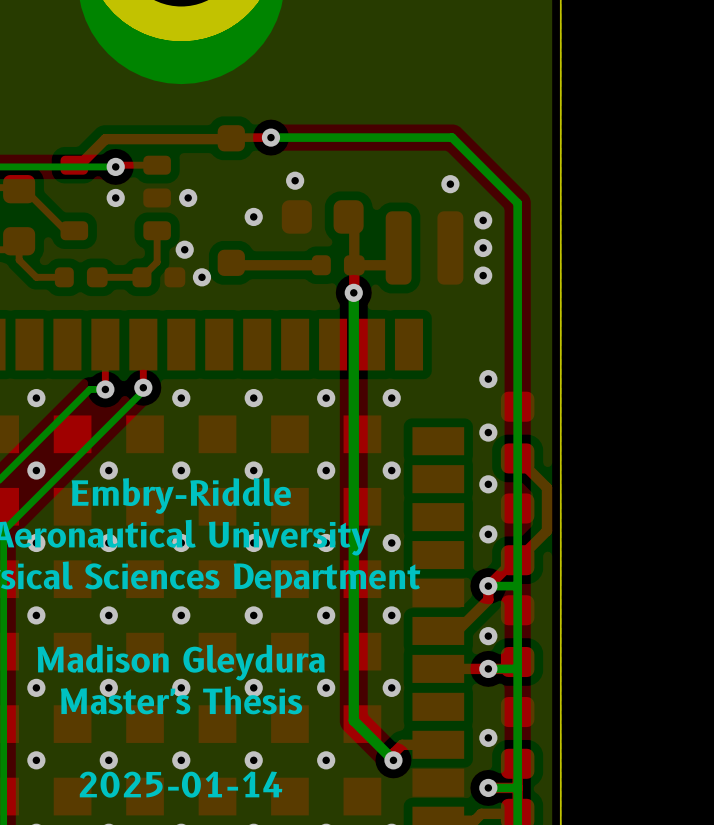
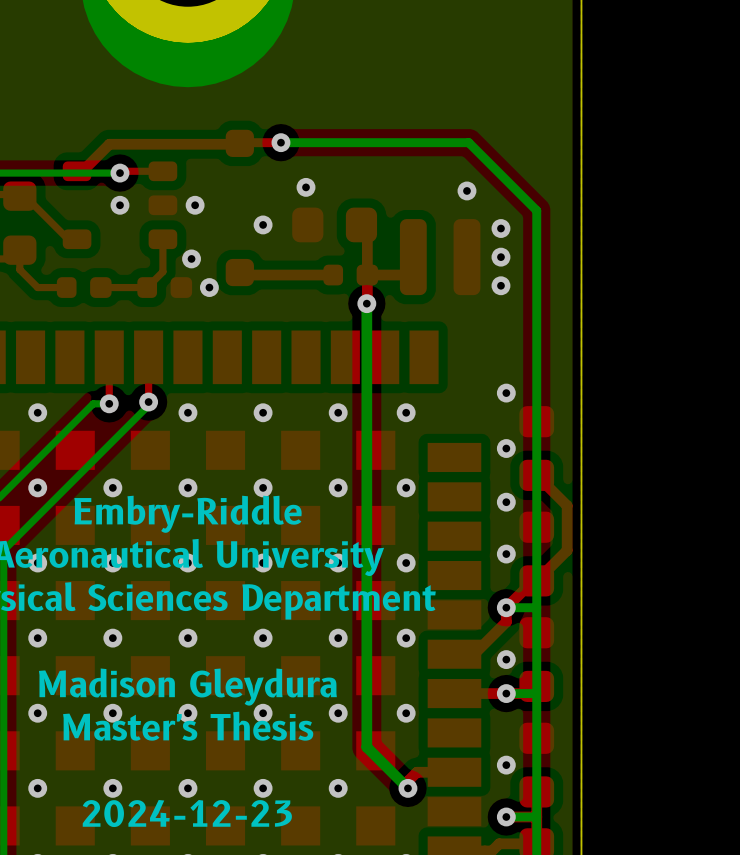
text: 2025-01-14 (181, 784) -> 2024-12-23 (187, 813)

